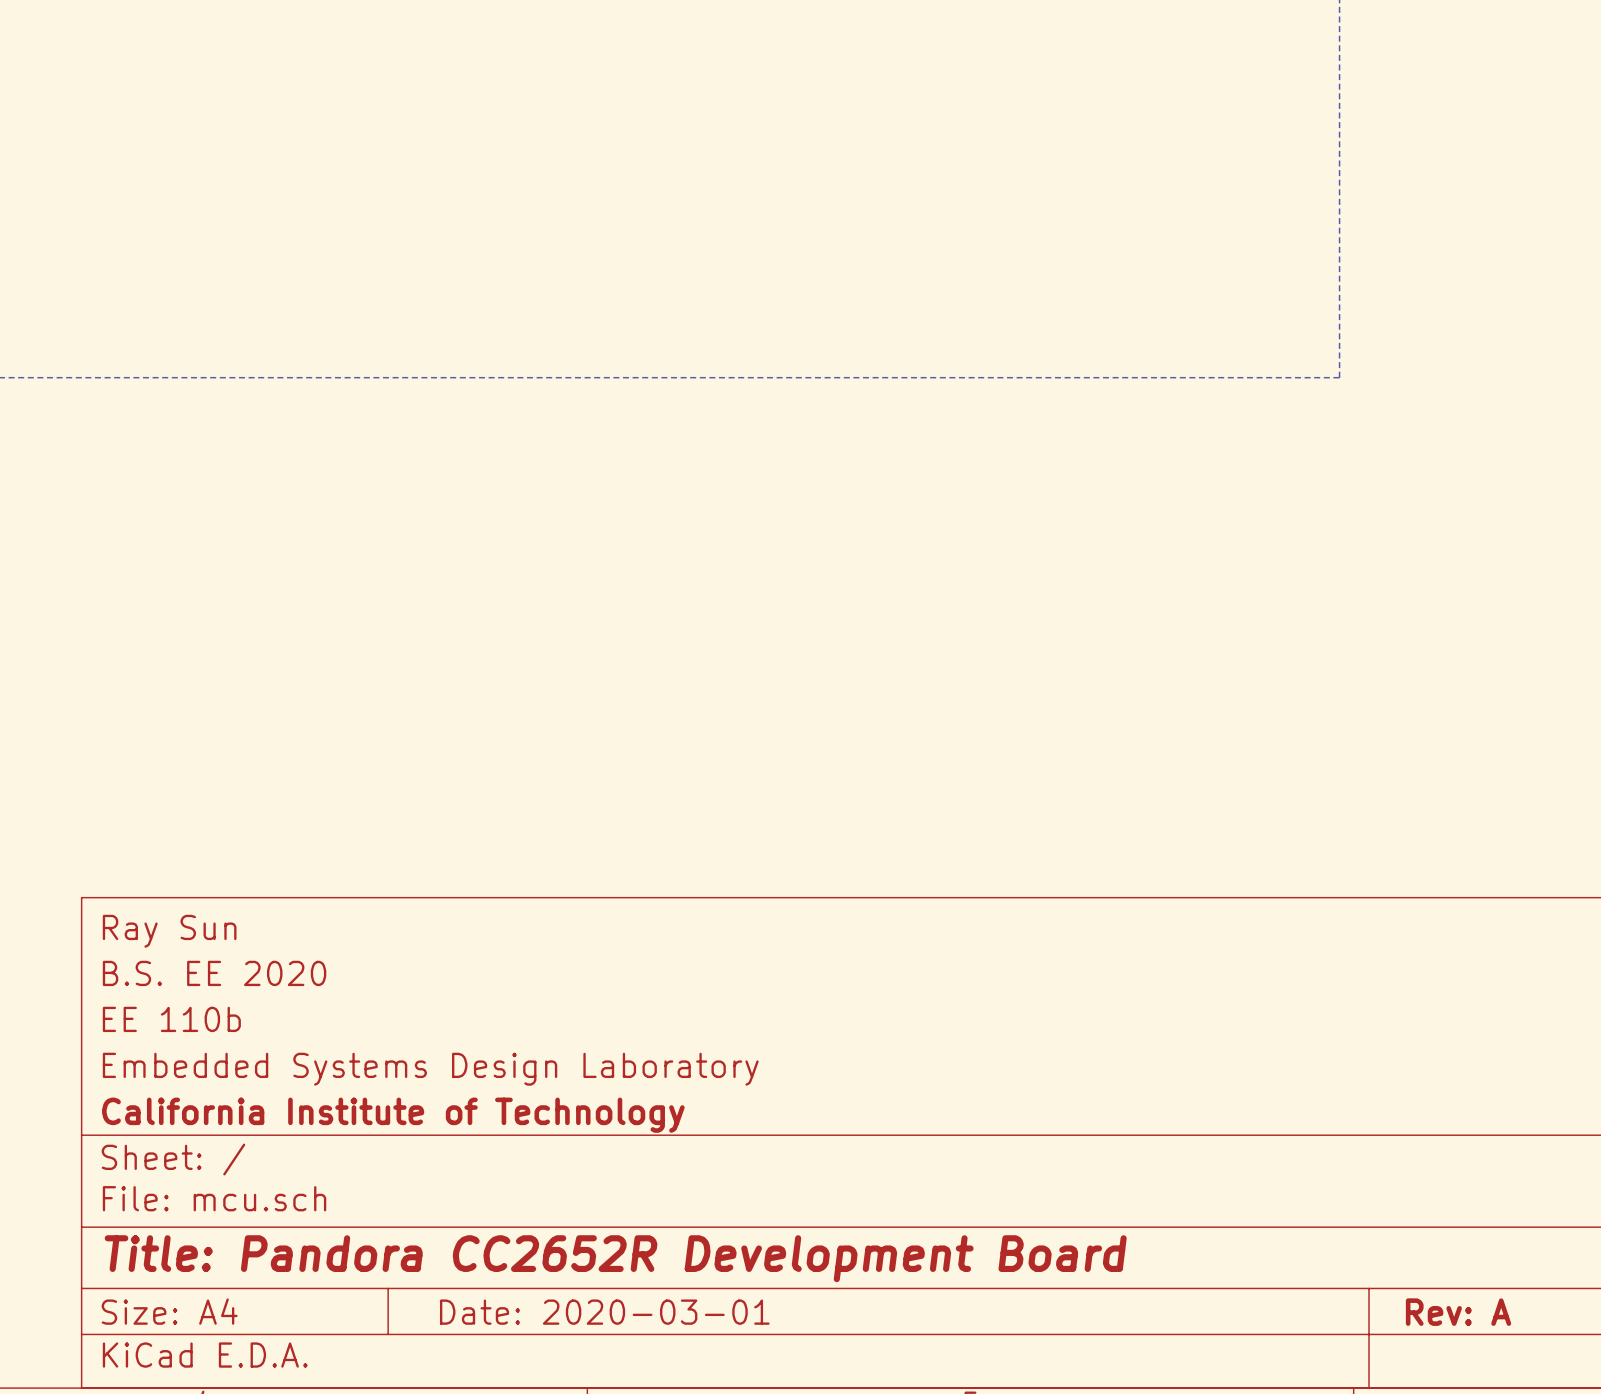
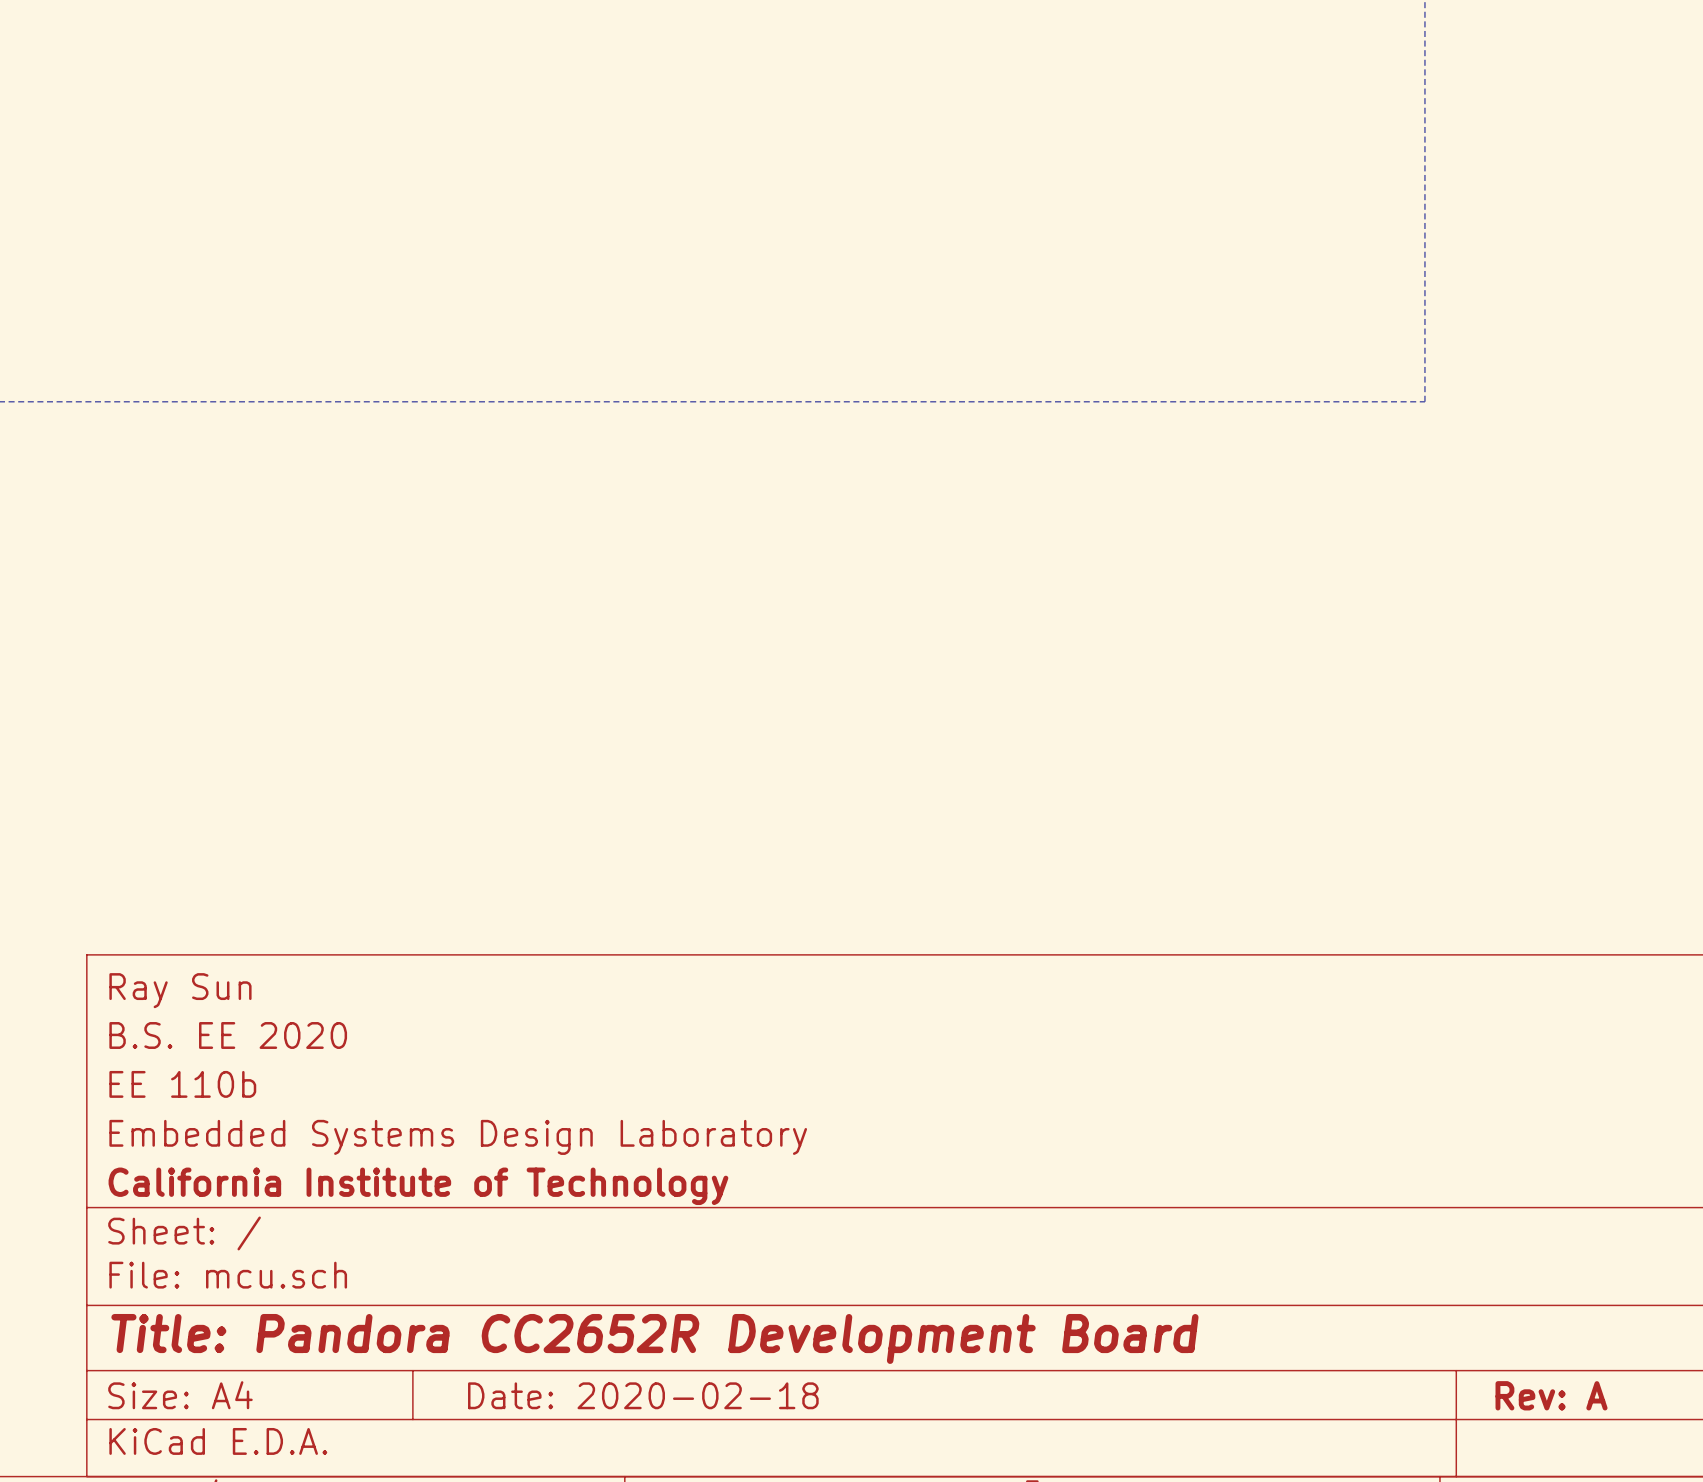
title block: Date: 2020-03-01 (604, 1312) -> Date: 2020-02-18 (643, 1395)

